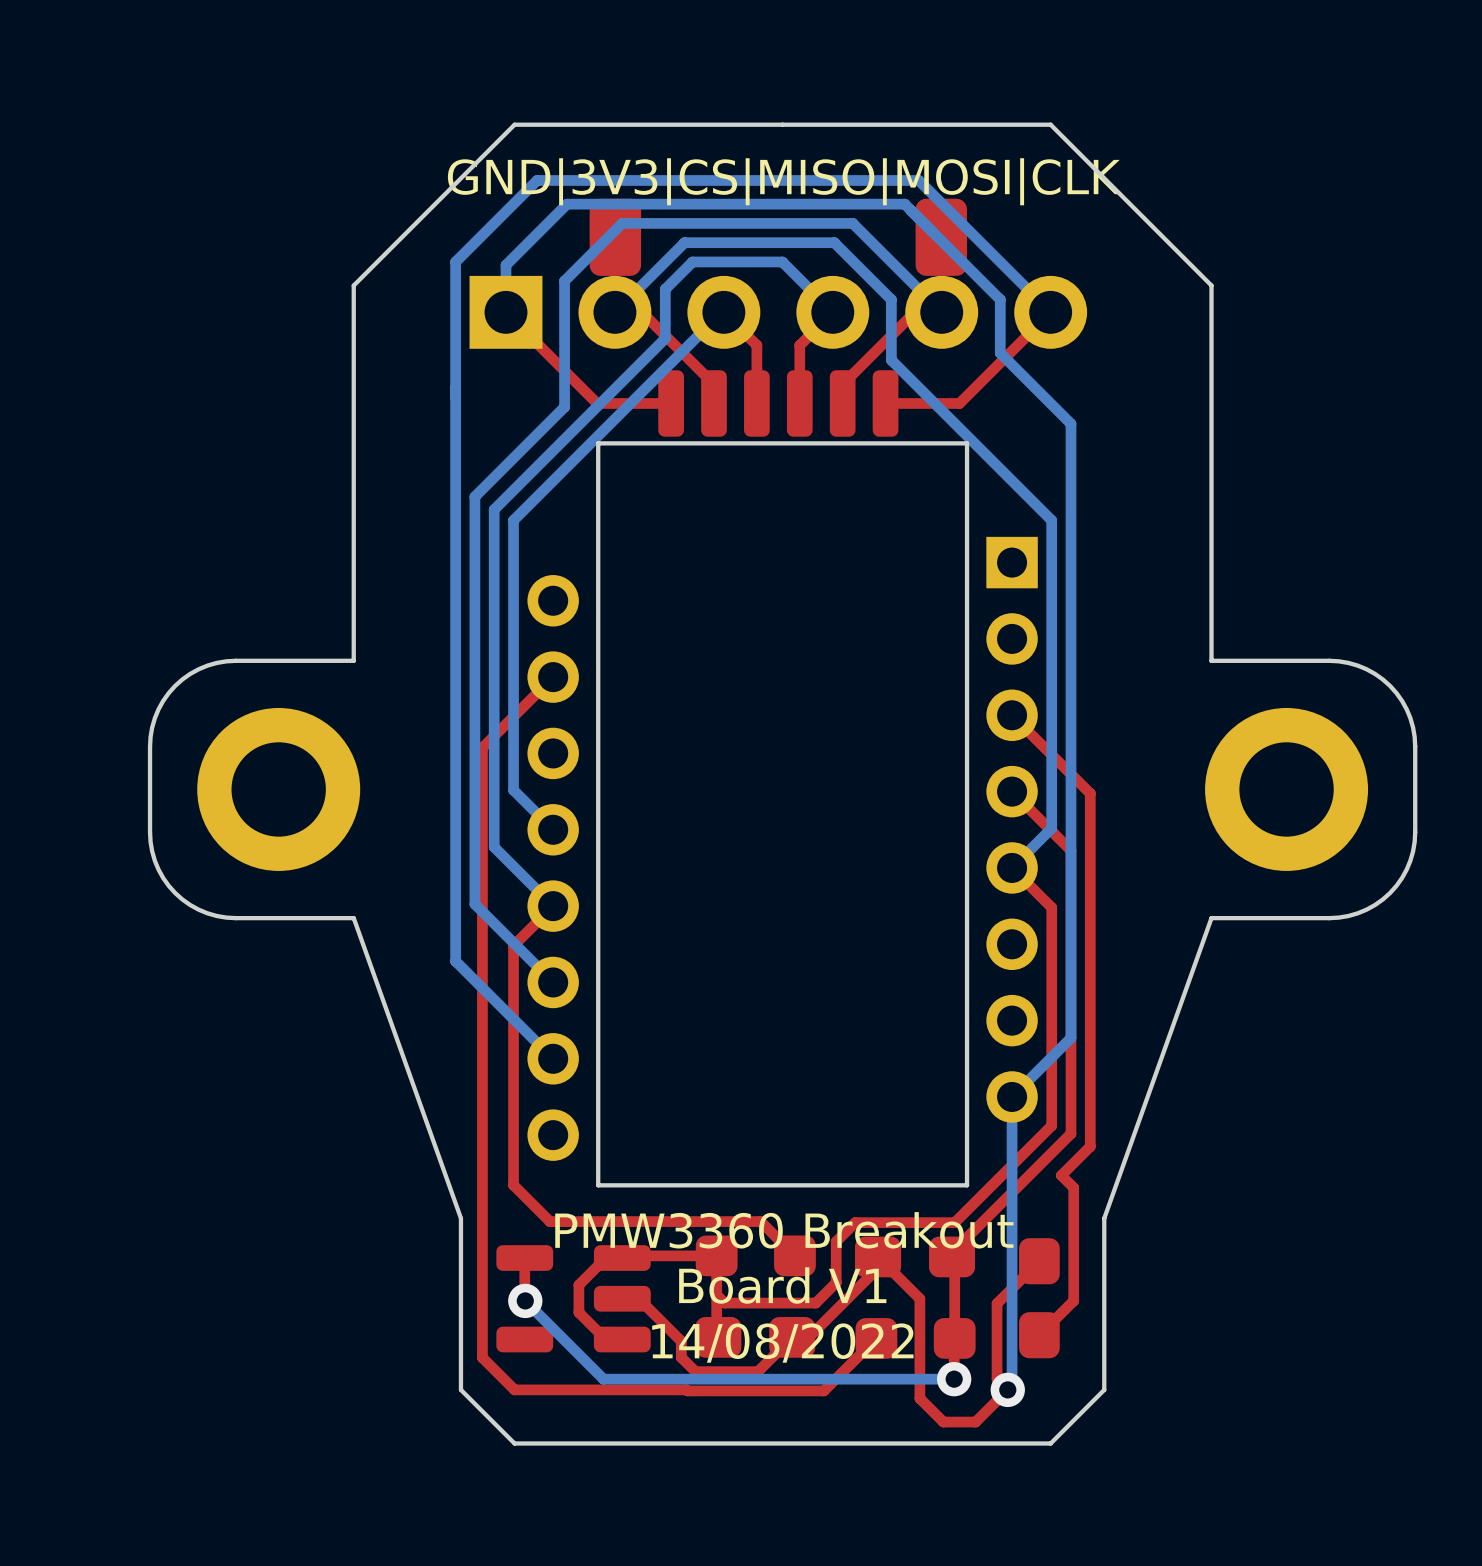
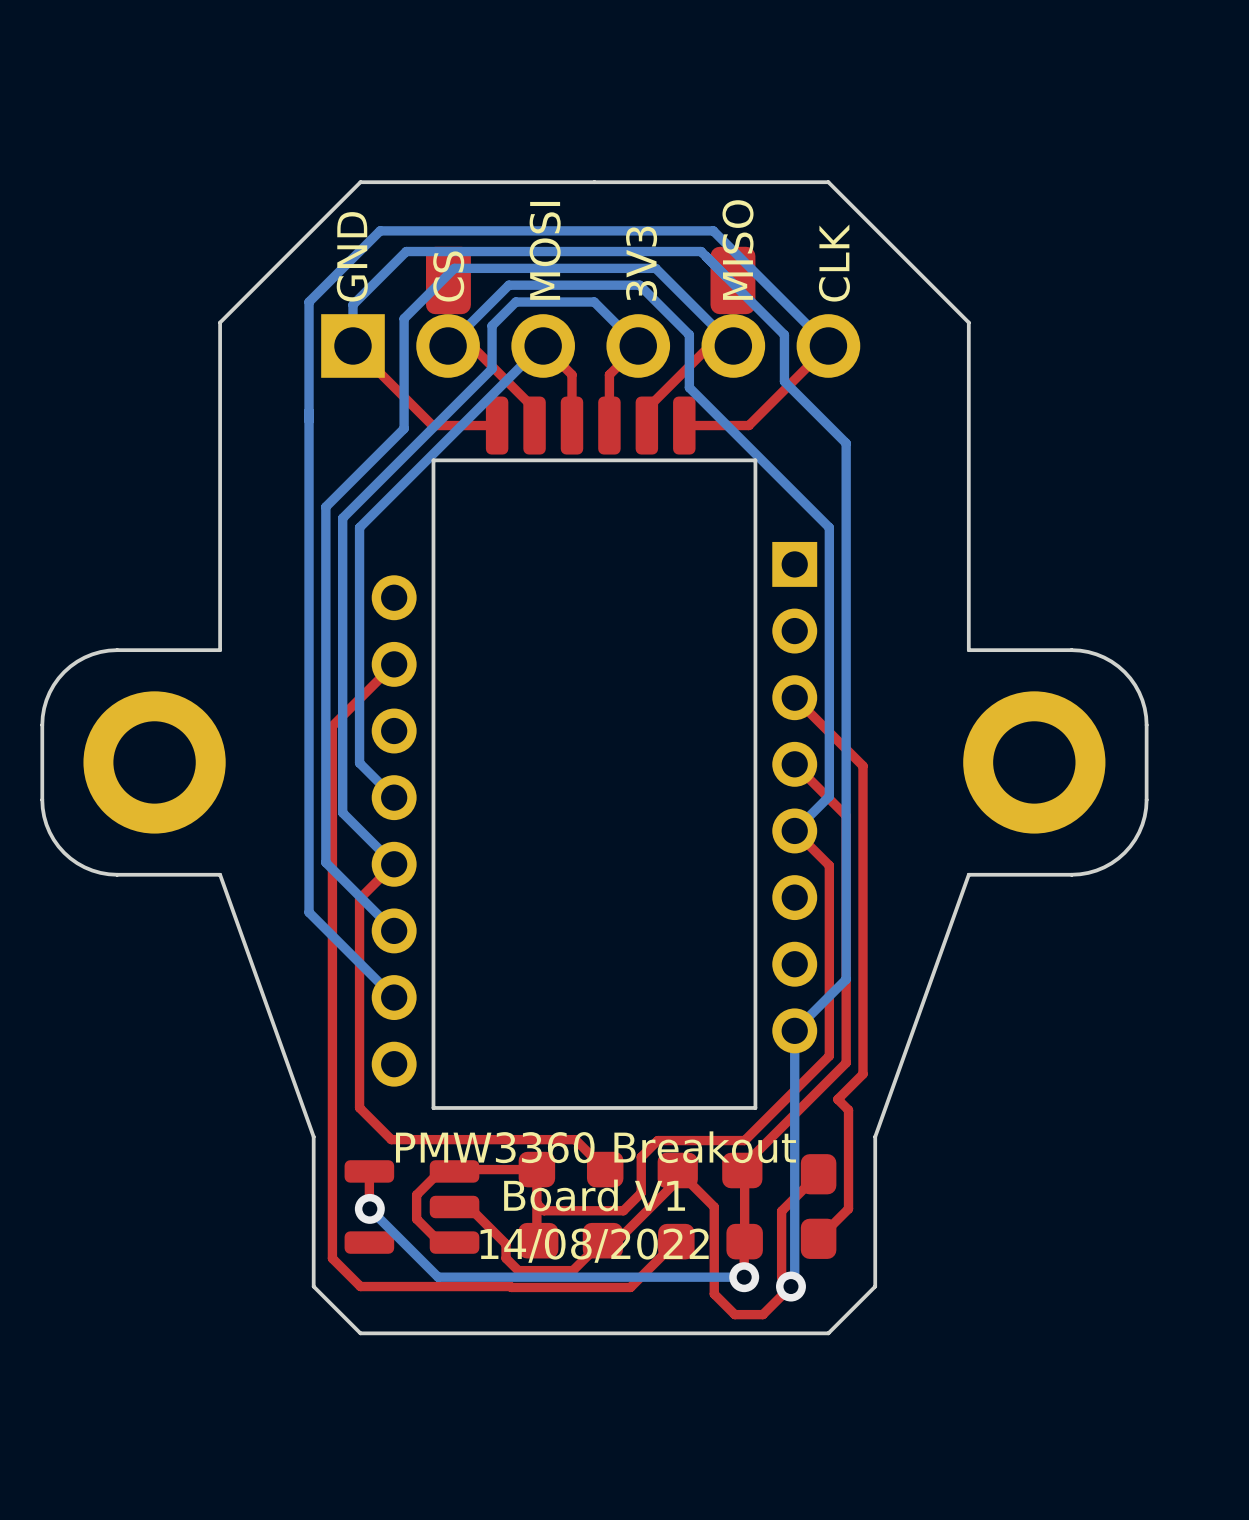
text: GND|3V3|CS|MISO|MOSI|CLK (784, 181) -> none
text: none -> MISO (738, 250)
text: none -> MOSI (545, 250)
text: none -> GND (352, 256)
text: none -> CLK (834, 263)
text: none -> 3V3 (641, 263)
text: none -> CS (448, 276)

